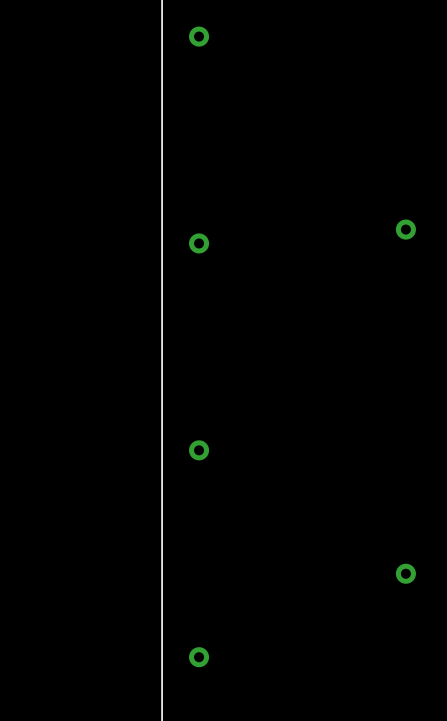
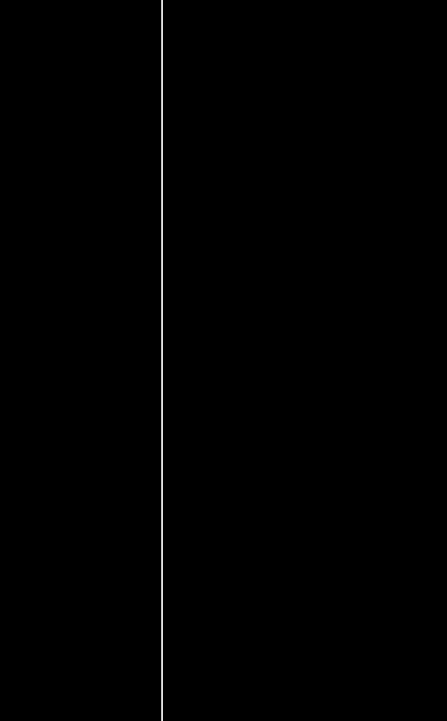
via: (199, 36) -> none
via: (405, 229) -> none
via: (199, 243) -> none
via: (199, 450) -> none
via: (405, 573) -> none
via: (199, 657) -> none

